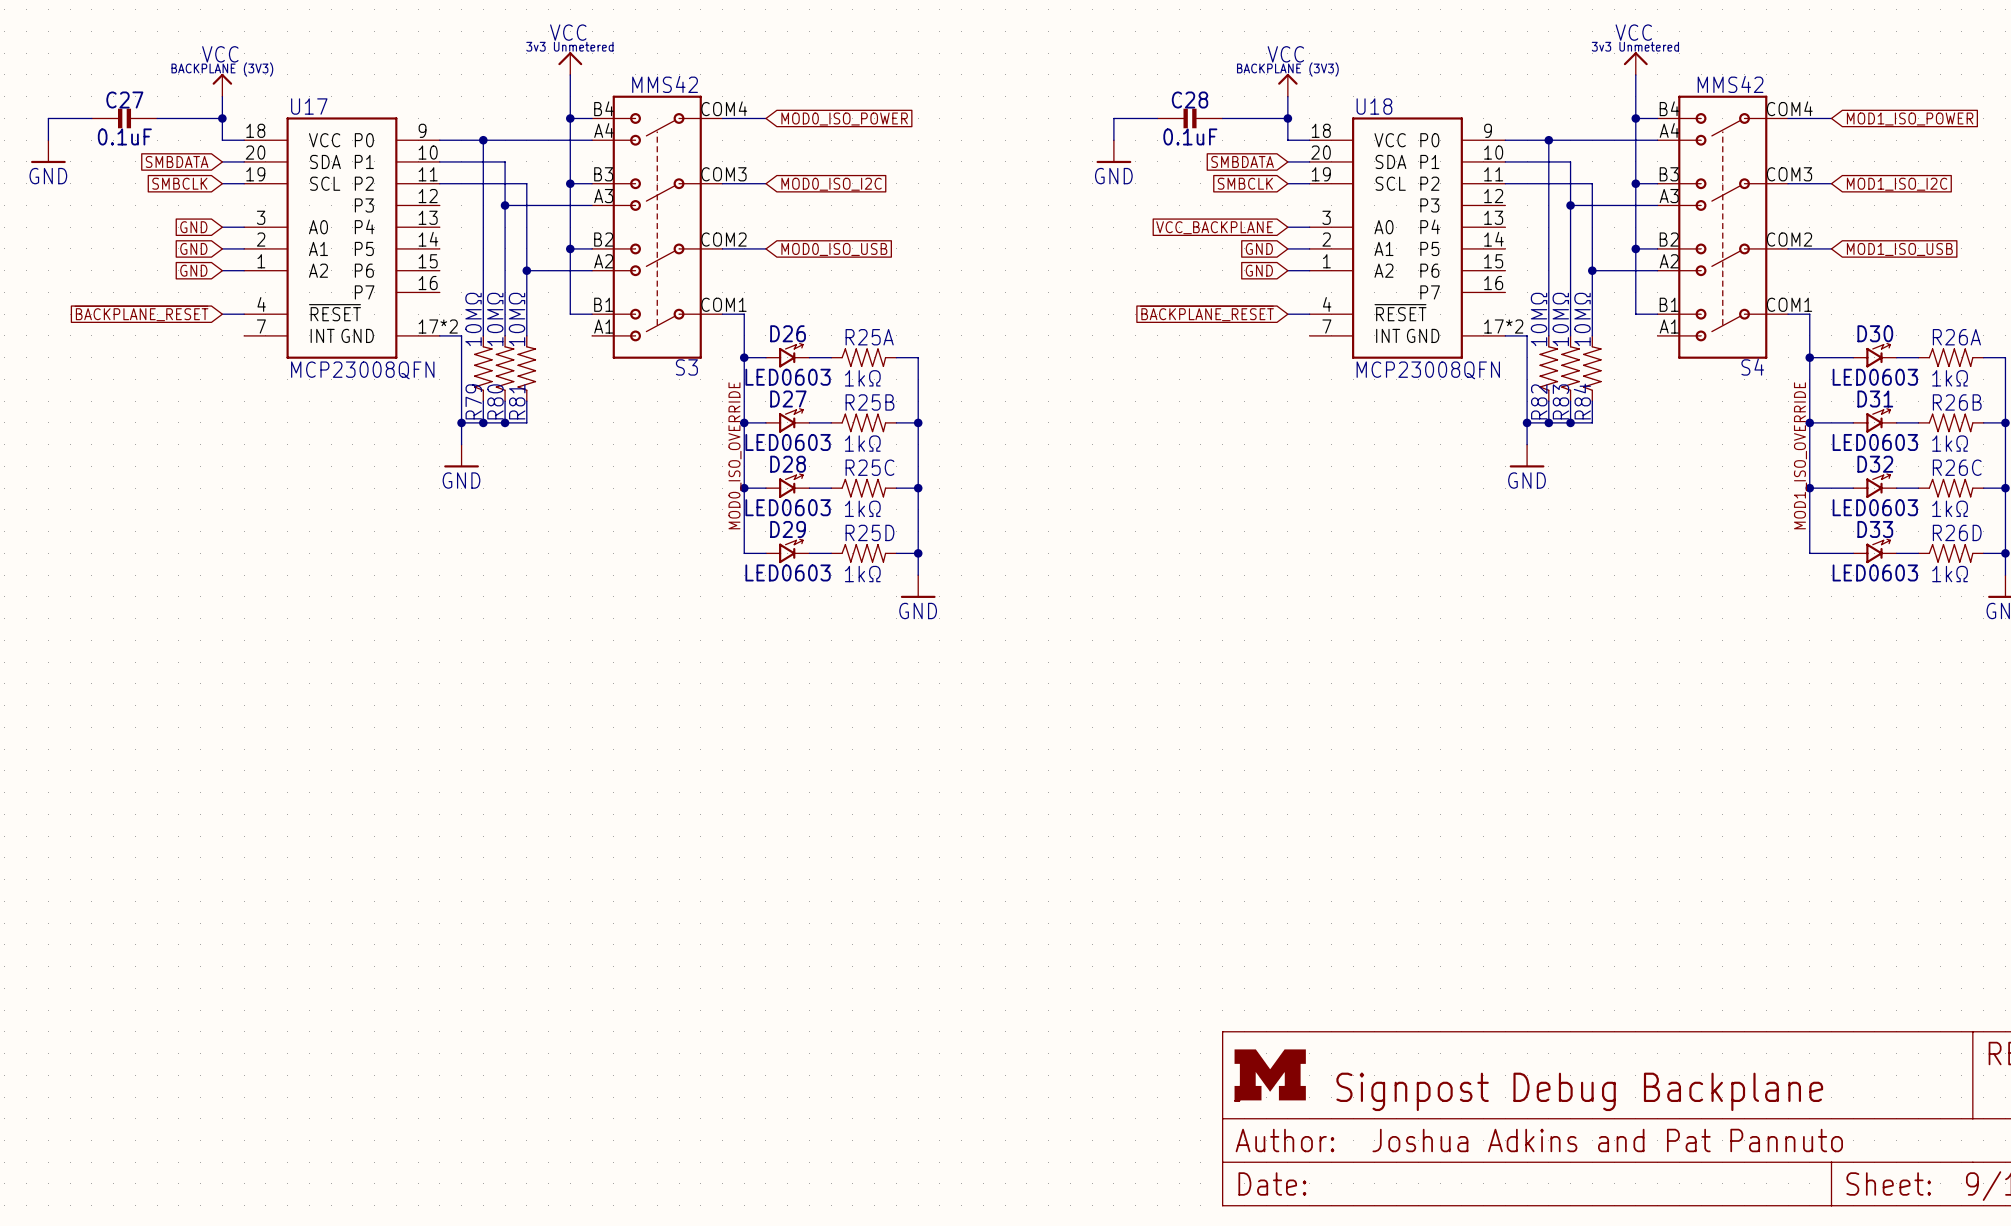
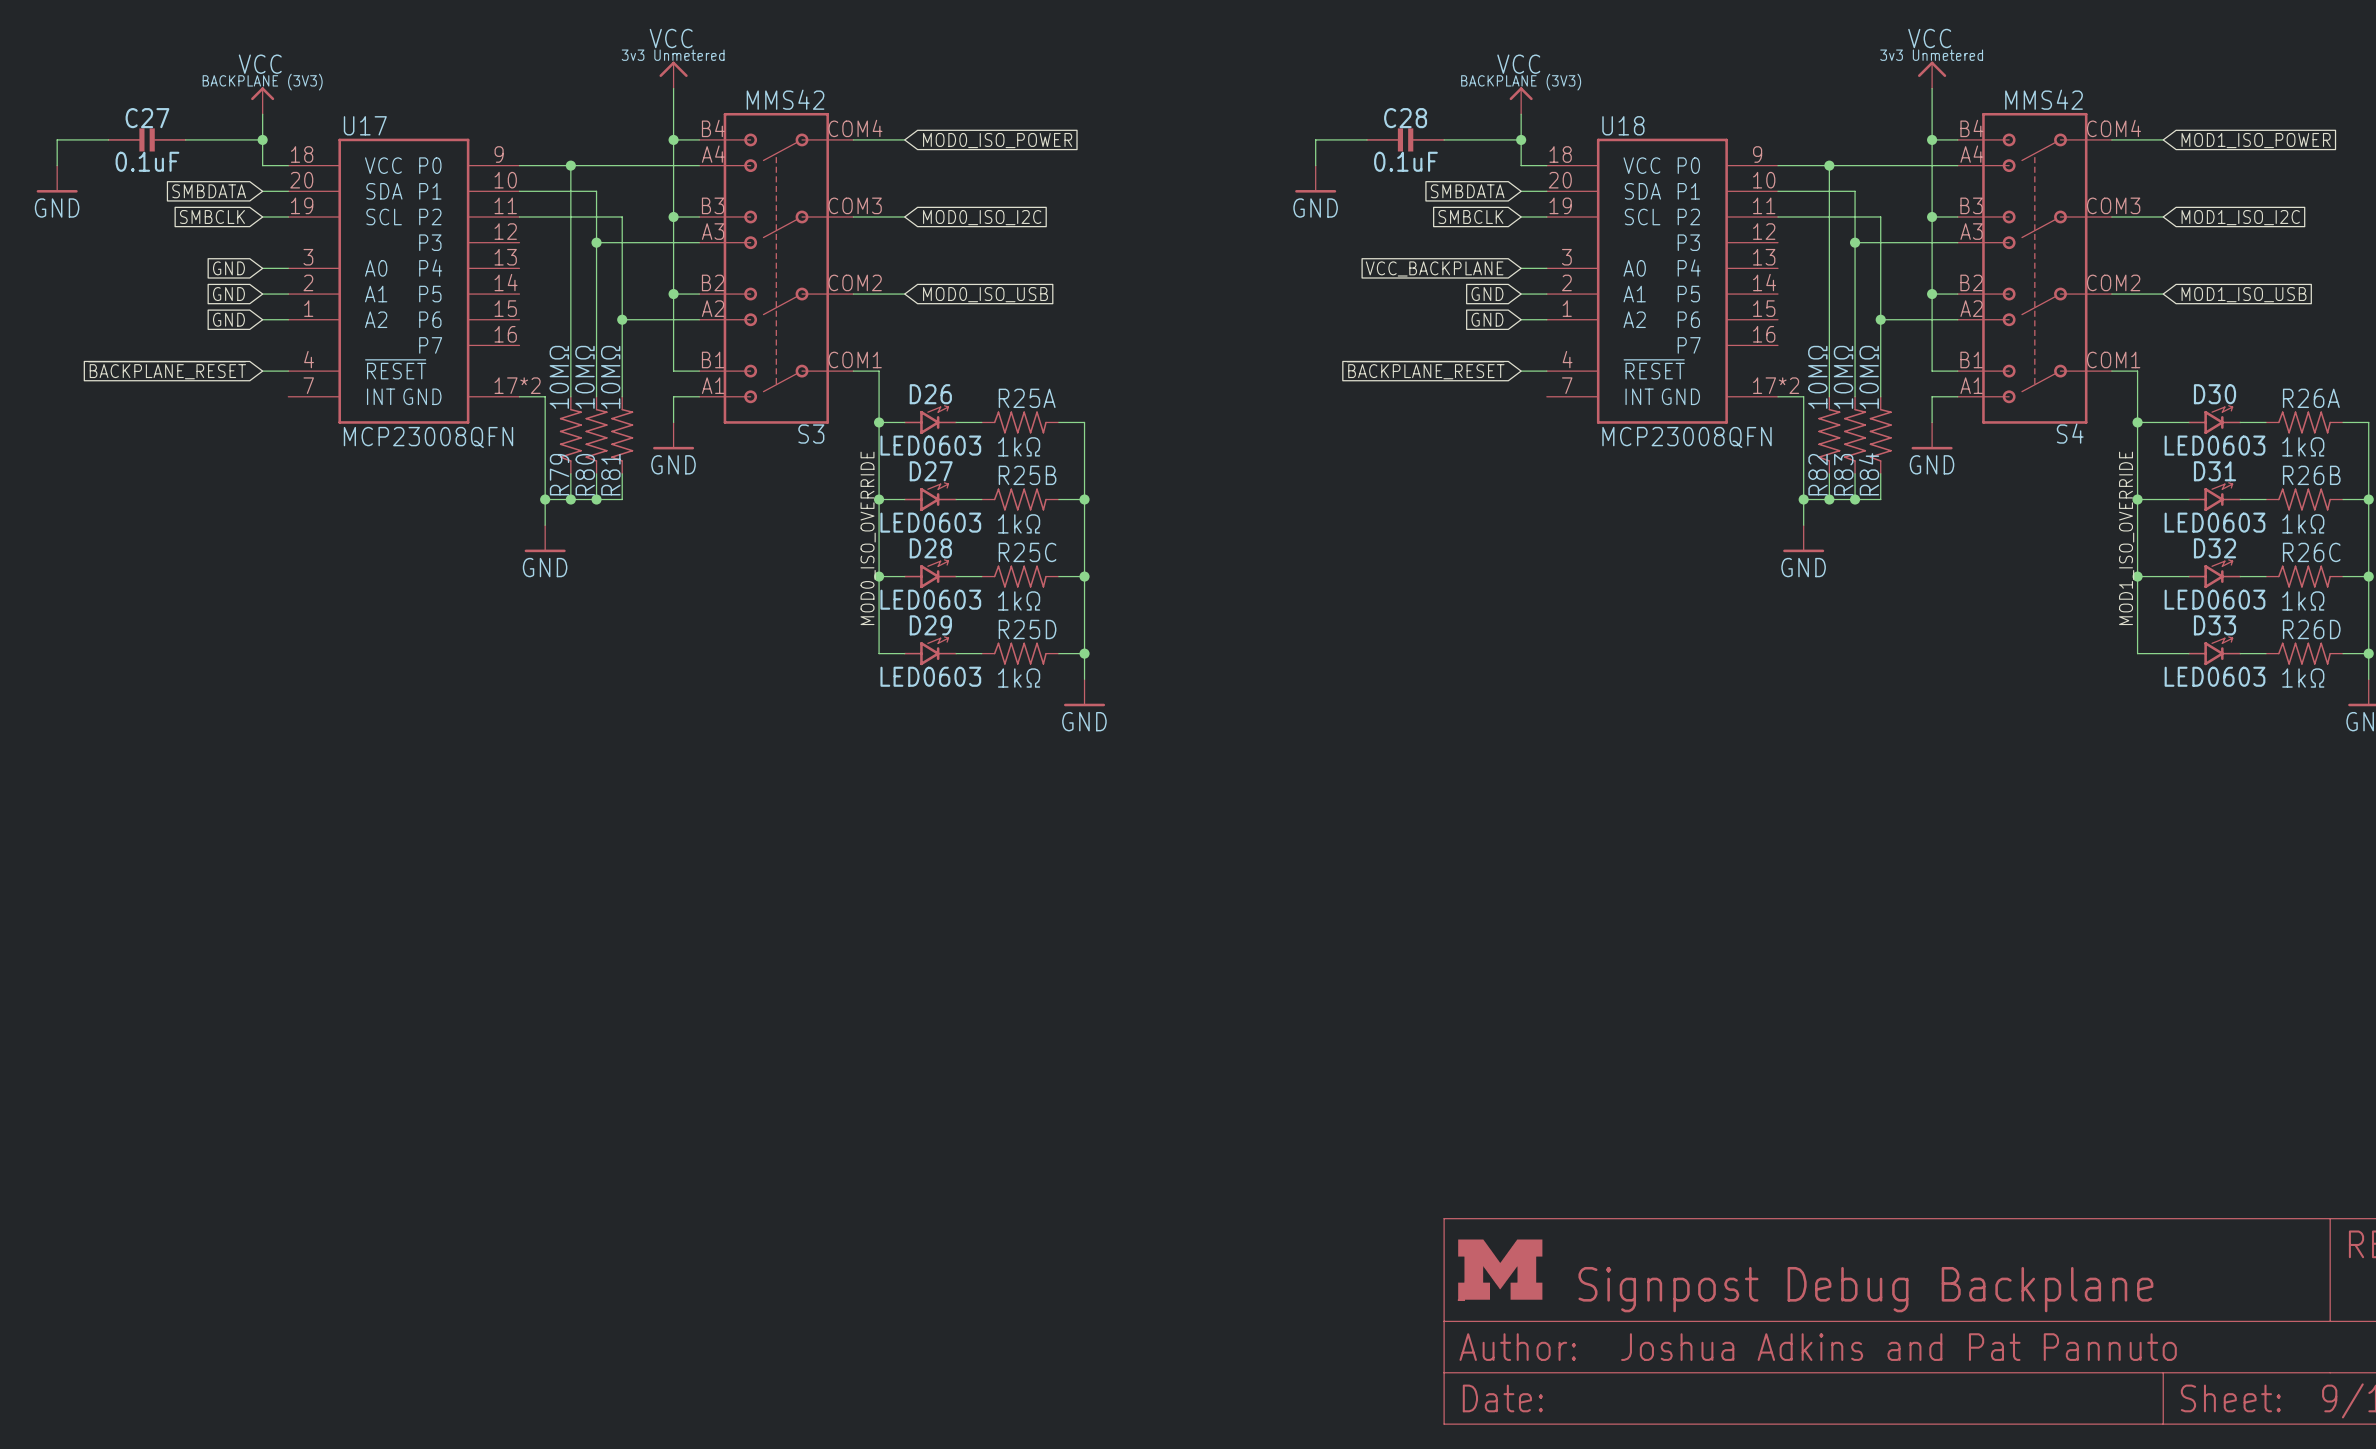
wire: none -> (699, 396) (673, 396) (673, 422)
wire: none -> (1957, 396) (1932, 396) (1932, 422)
power symbol: none -> GND (673, 435)
power symbol: none -> GND (1932, 435)

